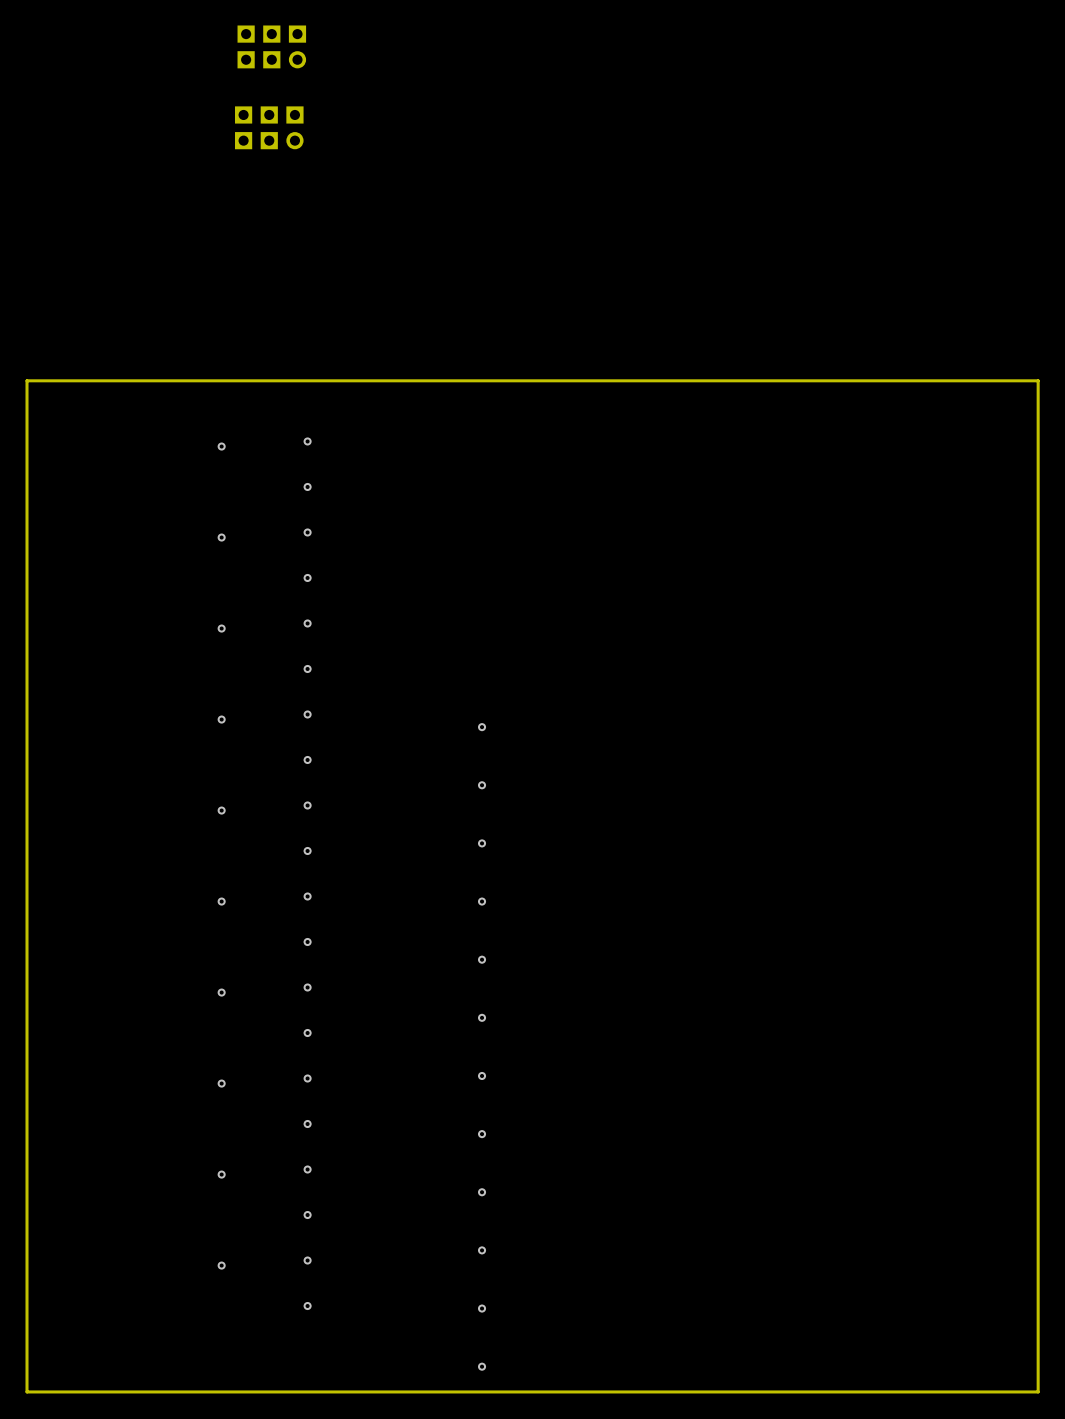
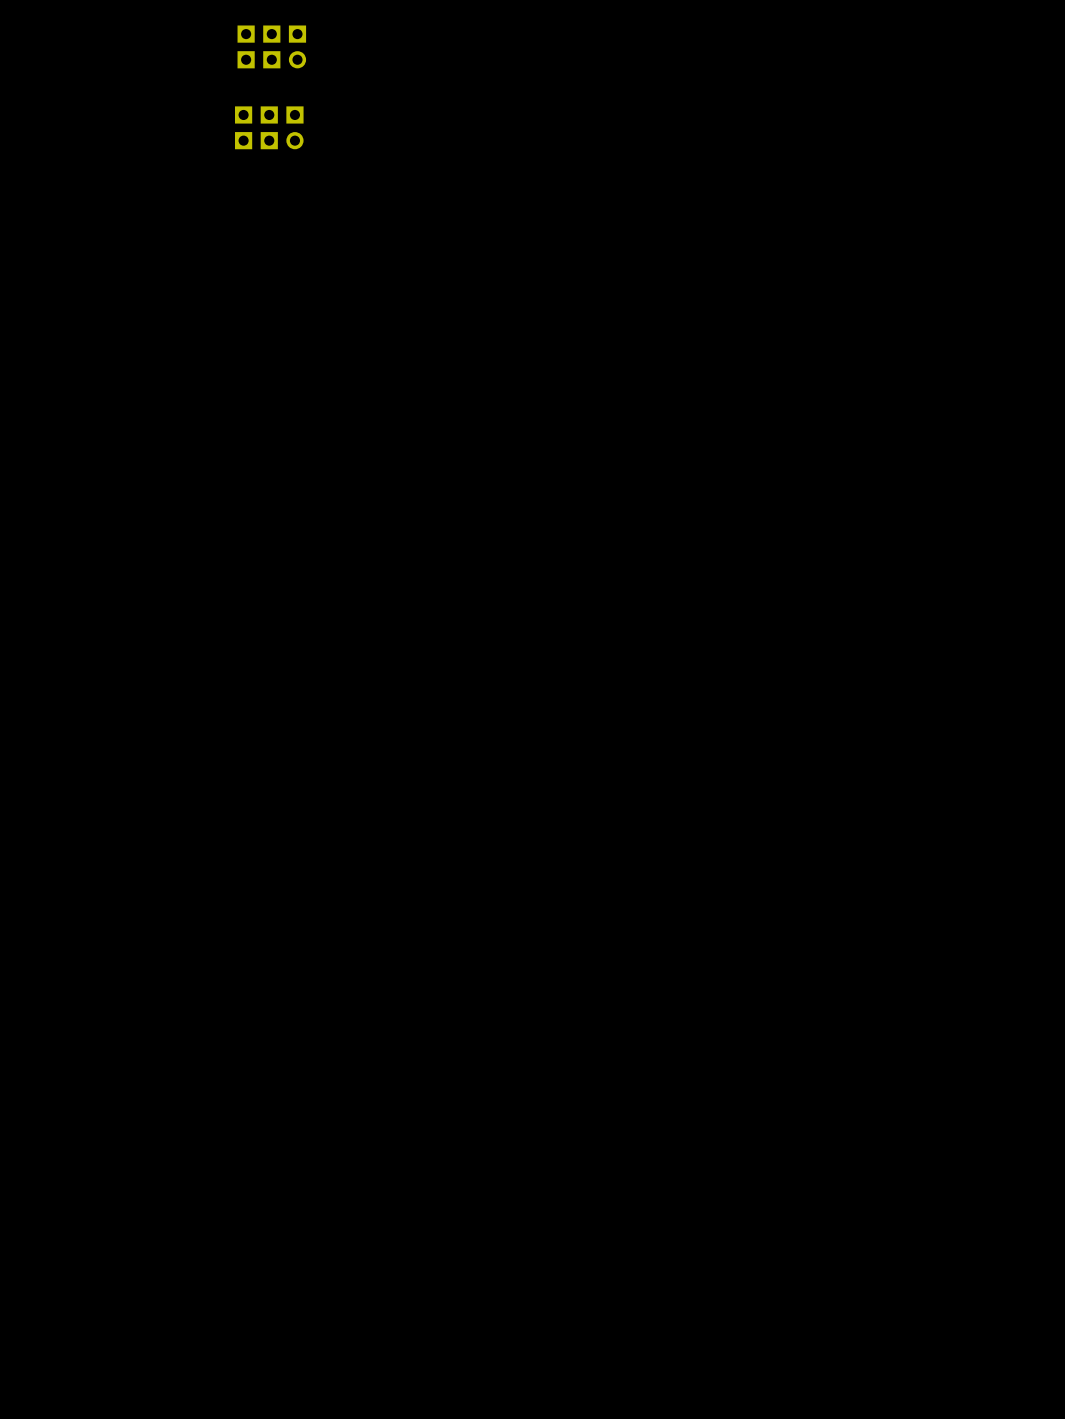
board edge: (1038, 380) (1038, 1391) (27, 1391) (27, 380) (1038, 380) -> none
via: (307, 441) -> none
via: (221, 446) -> none
via: (307, 486) -> none
via: (307, 532) -> none
via: (221, 537) -> none
via: (307, 577) -> none
via: (307, 623) -> none
via: (221, 628) -> none
via: (307, 668) -> none
via: (307, 714) -> none
via: (221, 719) -> none
via: (482, 727) -> none
via: (307, 759) -> none
via: (482, 785) -> none
via: (307, 805) -> none
via: (221, 810) -> none
via: (482, 843) -> none
via: (307, 850) -> none
via: (307, 896) -> none
via: (221, 901) -> none
via: (482, 901) -> none
via: (307, 942) -> none
via: (482, 959) -> none
via: (307, 987) -> none
via: (221, 992) -> none
via: (482, 1017) -> none
via: (307, 1033) -> none
via: (482, 1075) -> none
via: (307, 1078) -> none
via: (221, 1083) -> none
via: (307, 1124) -> none
via: (482, 1134) -> none
via: (307, 1169) -> none
via: (221, 1174) -> none
via: (482, 1192) -> none
via: (307, 1215) -> none
via: (482, 1250) -> none
via: (307, 1260) -> none
via: (221, 1265) -> none
via: (307, 1306) -> none
via: (482, 1308) -> none
via: (482, 1366) -> none

